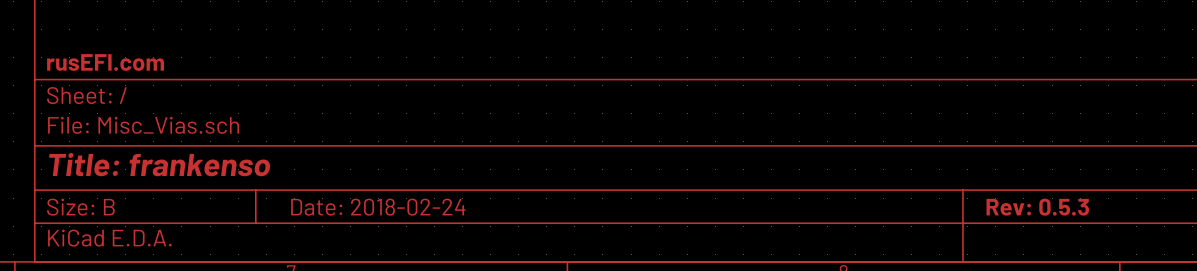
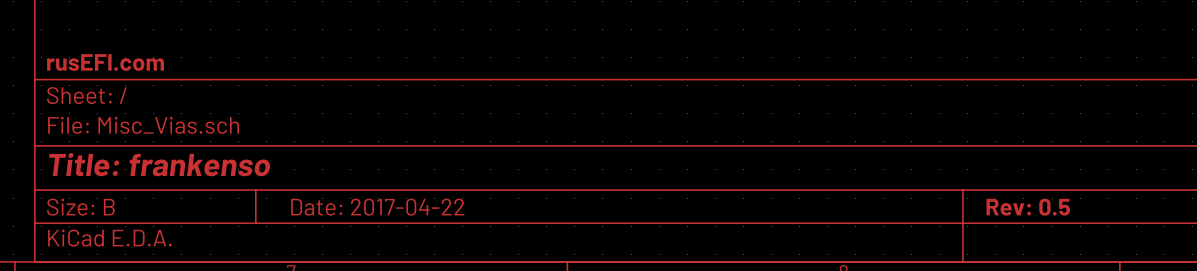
title block: Date: 2018-02-24 (378, 207) -> Date: 2017-04-22 (377, 207)
title block: Rev: 0.5.3 (1037, 207) -> Rev: 0.5 (1028, 207)

